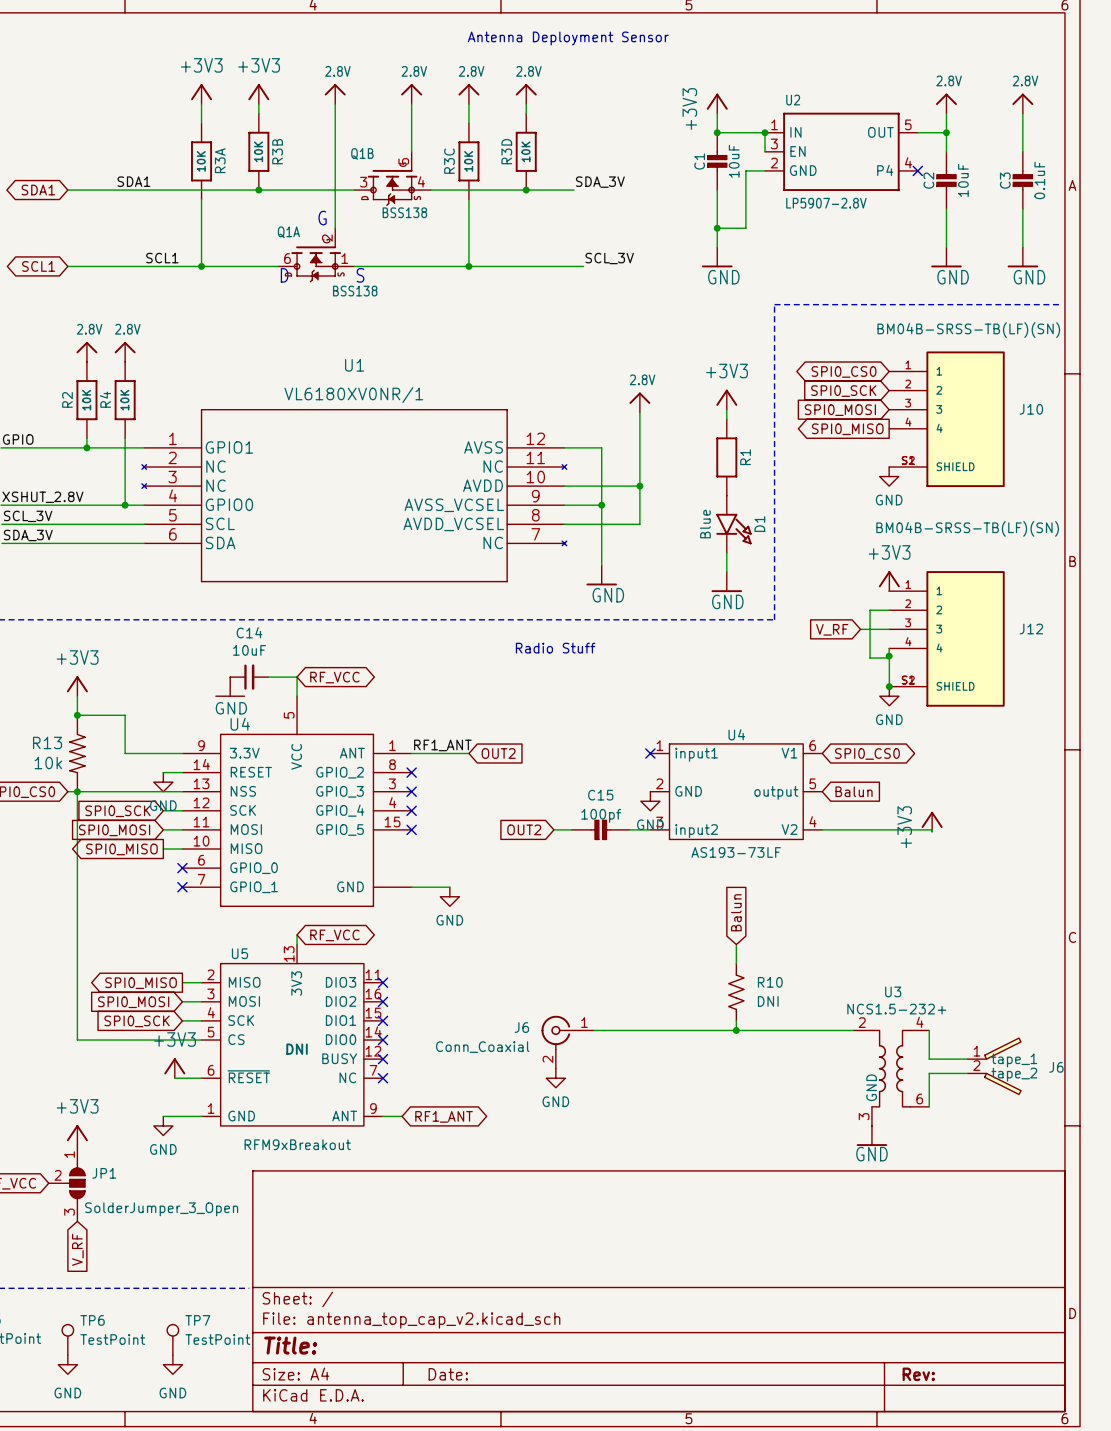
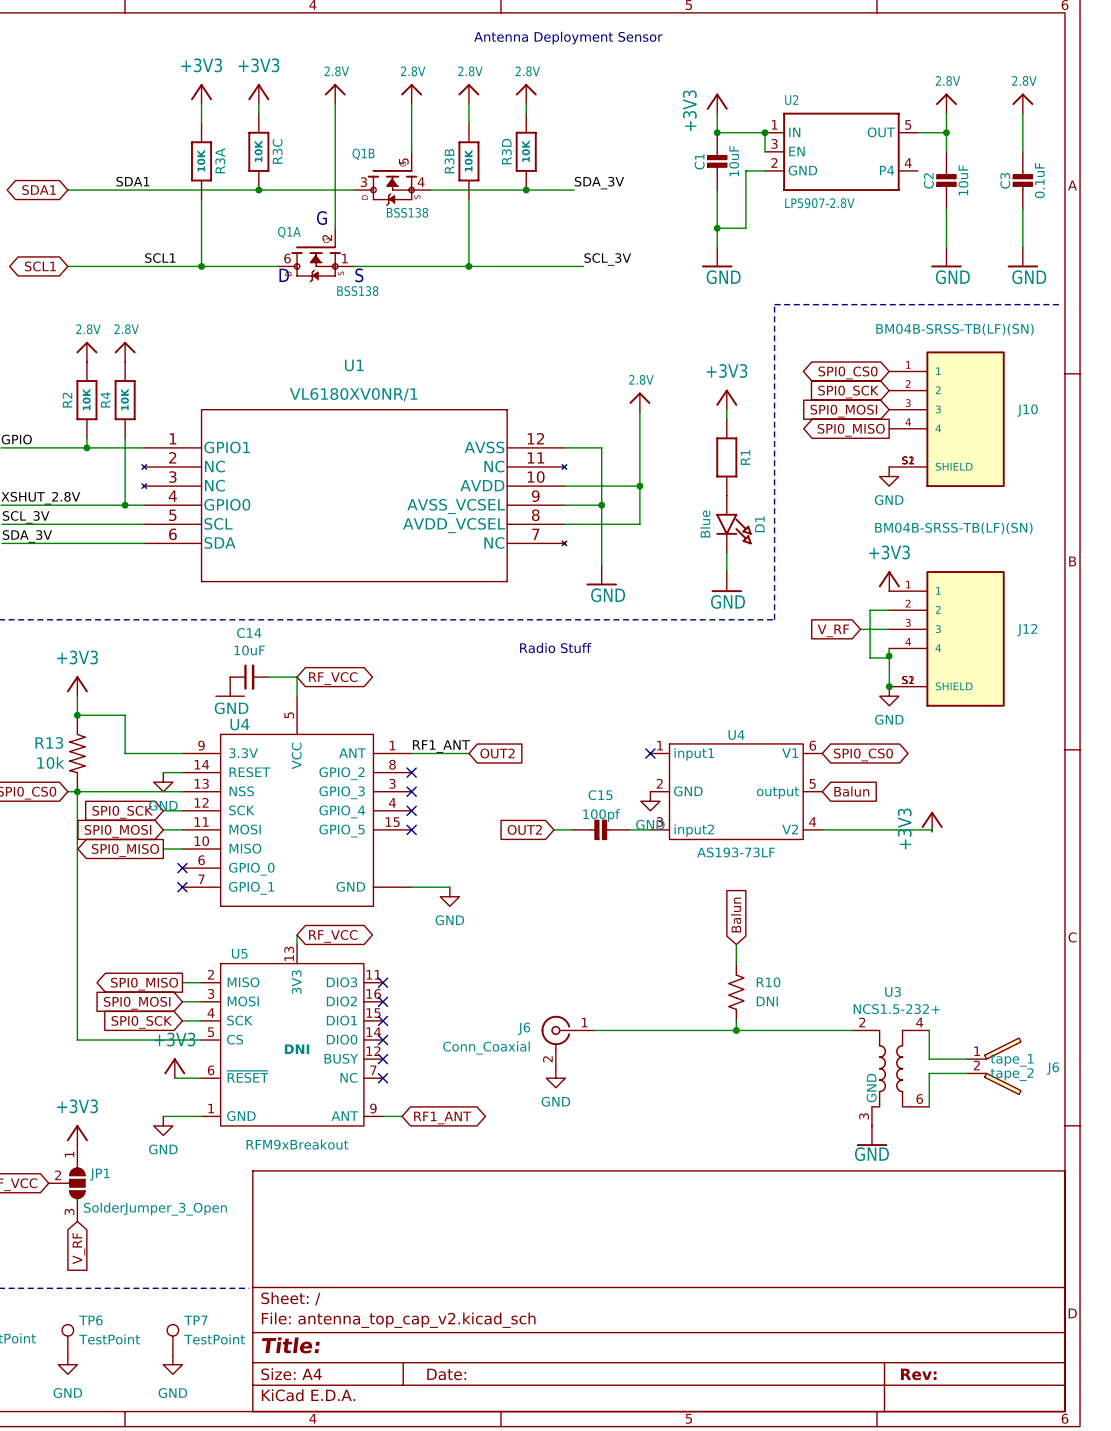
R3B name: R3B (277, 151) -> R3C (277, 151)
R3C name: R3C (449, 161) -> R3B (449, 161)
no-connect mark: (917, 170) -> none

